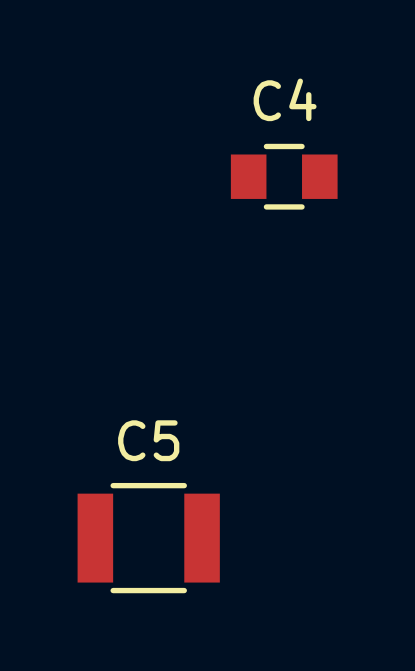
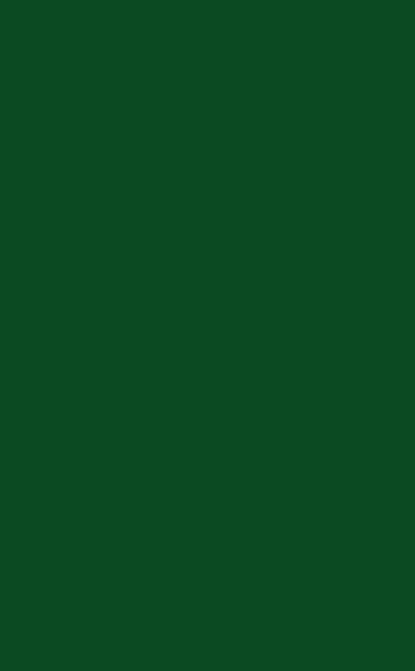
C4: (284, 176) -> none
C5: (148, 538) -> none

